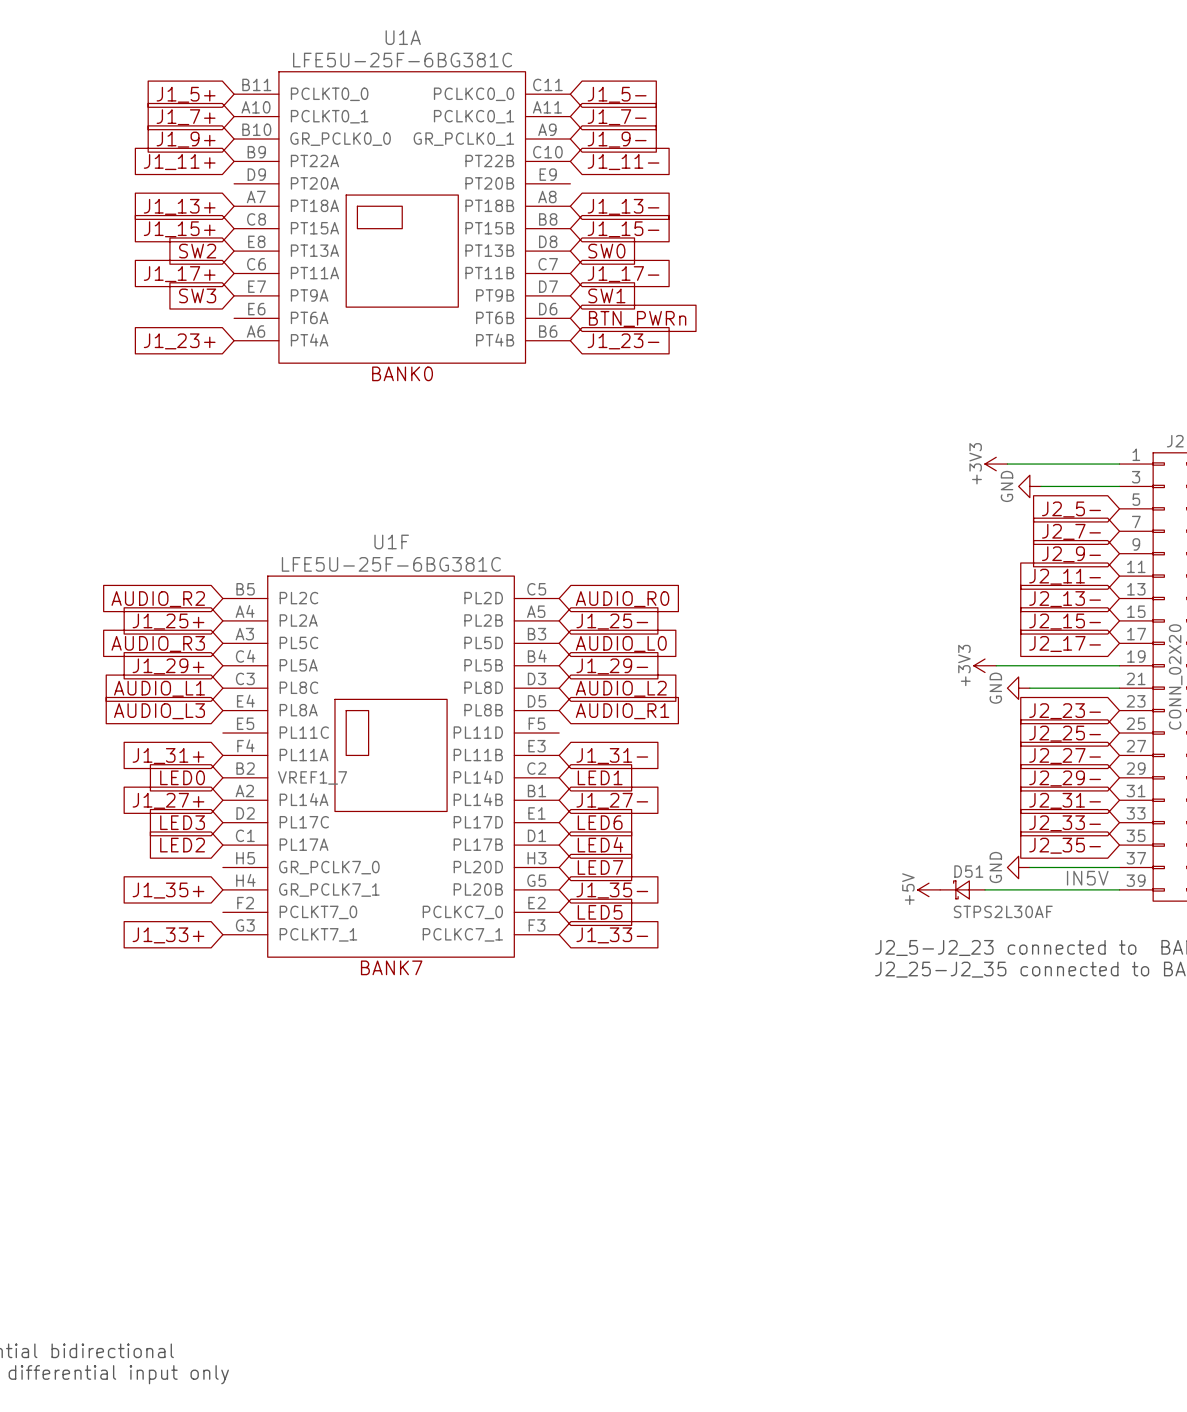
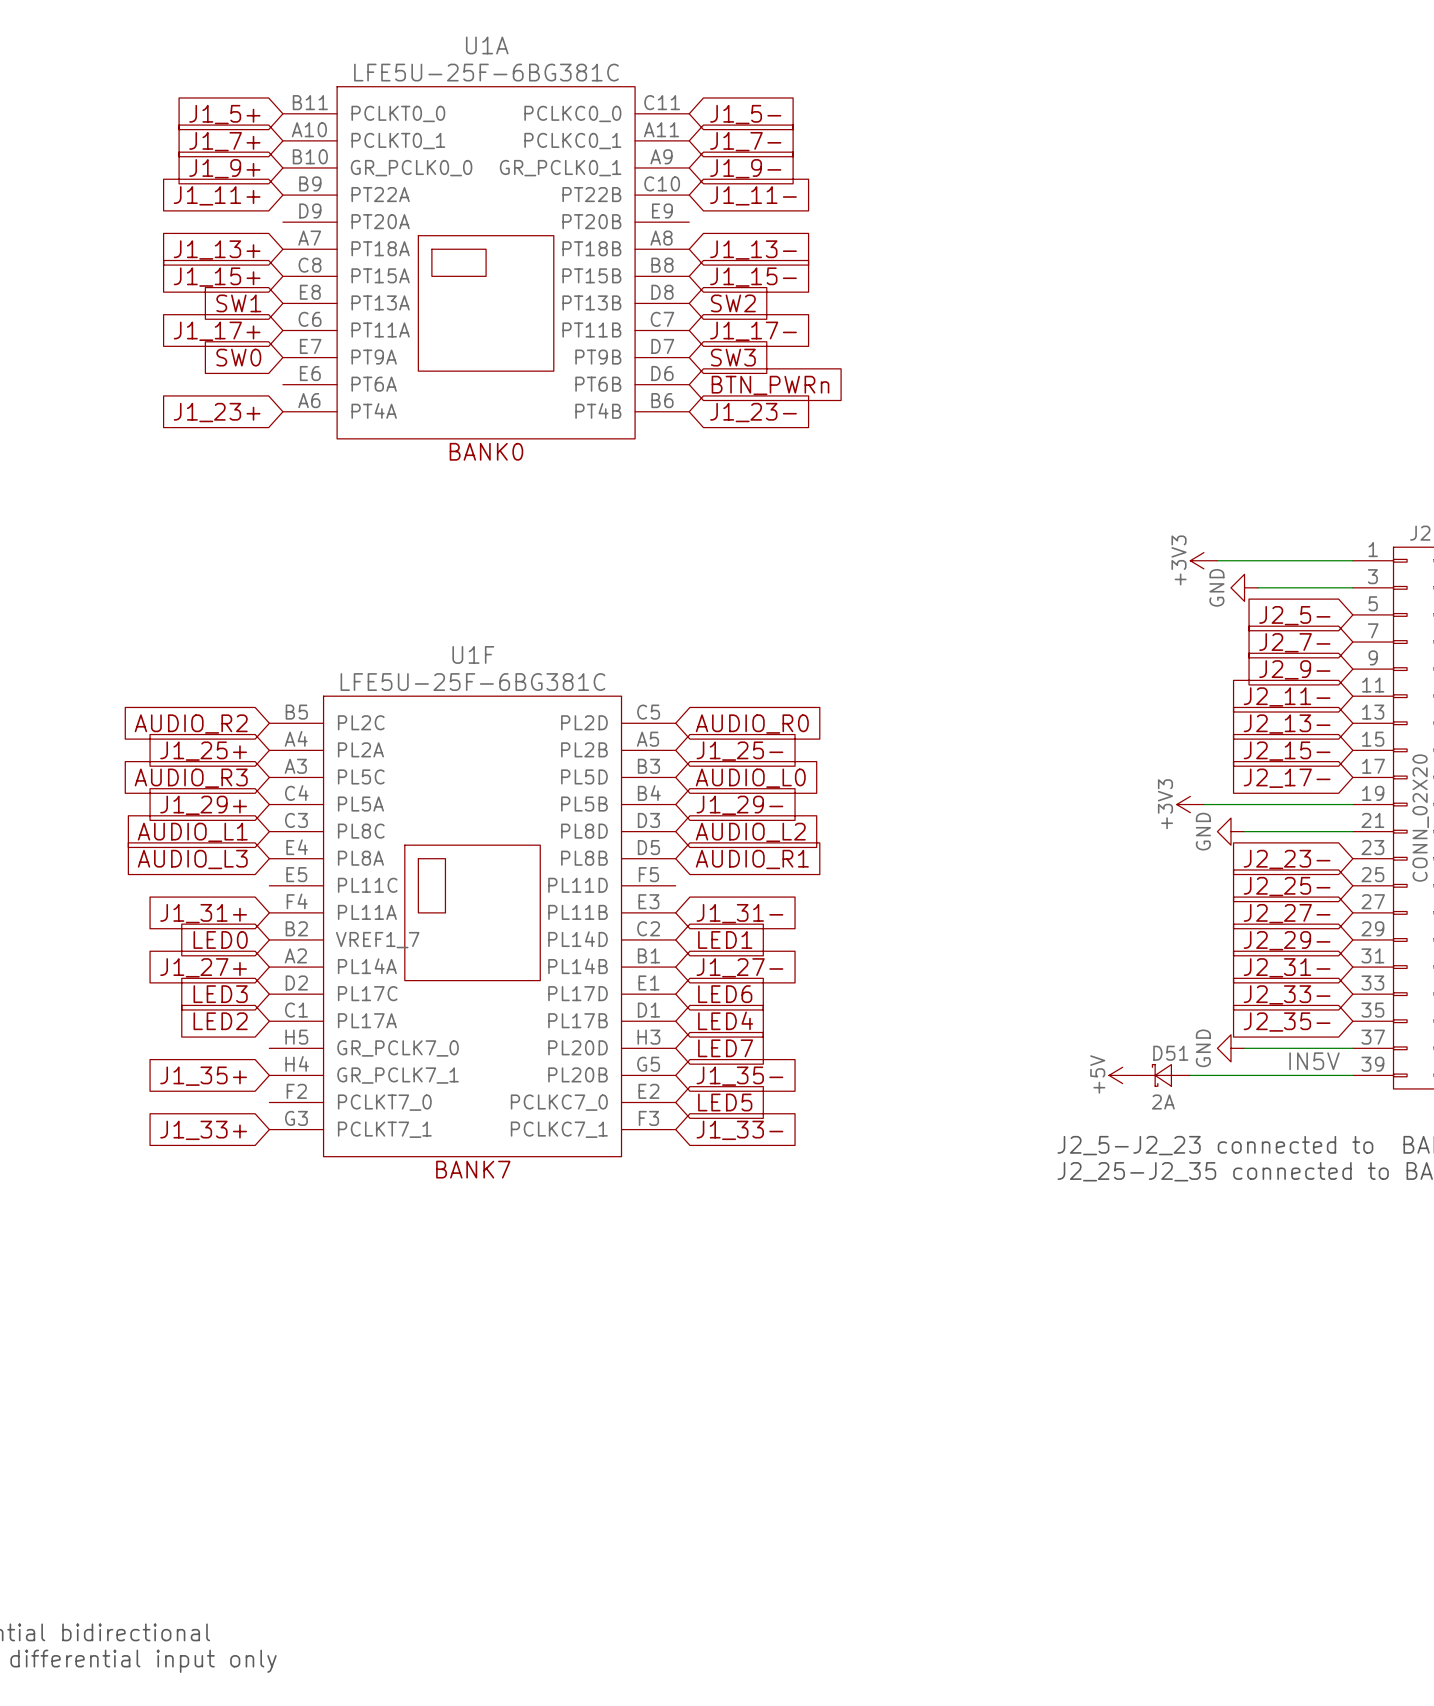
global label: SW2 (197, 251) -> SW1 (238, 303)
global label: SW0 (606, 251) -> SW2 (733, 303)
global label: SW3 (197, 295) -> SW0 (238, 357)
global label: SW1 (606, 295) -> SW3 (733, 357)
D51 value: STPS2L30AF (1003, 911) -> 2A (1163, 1101)

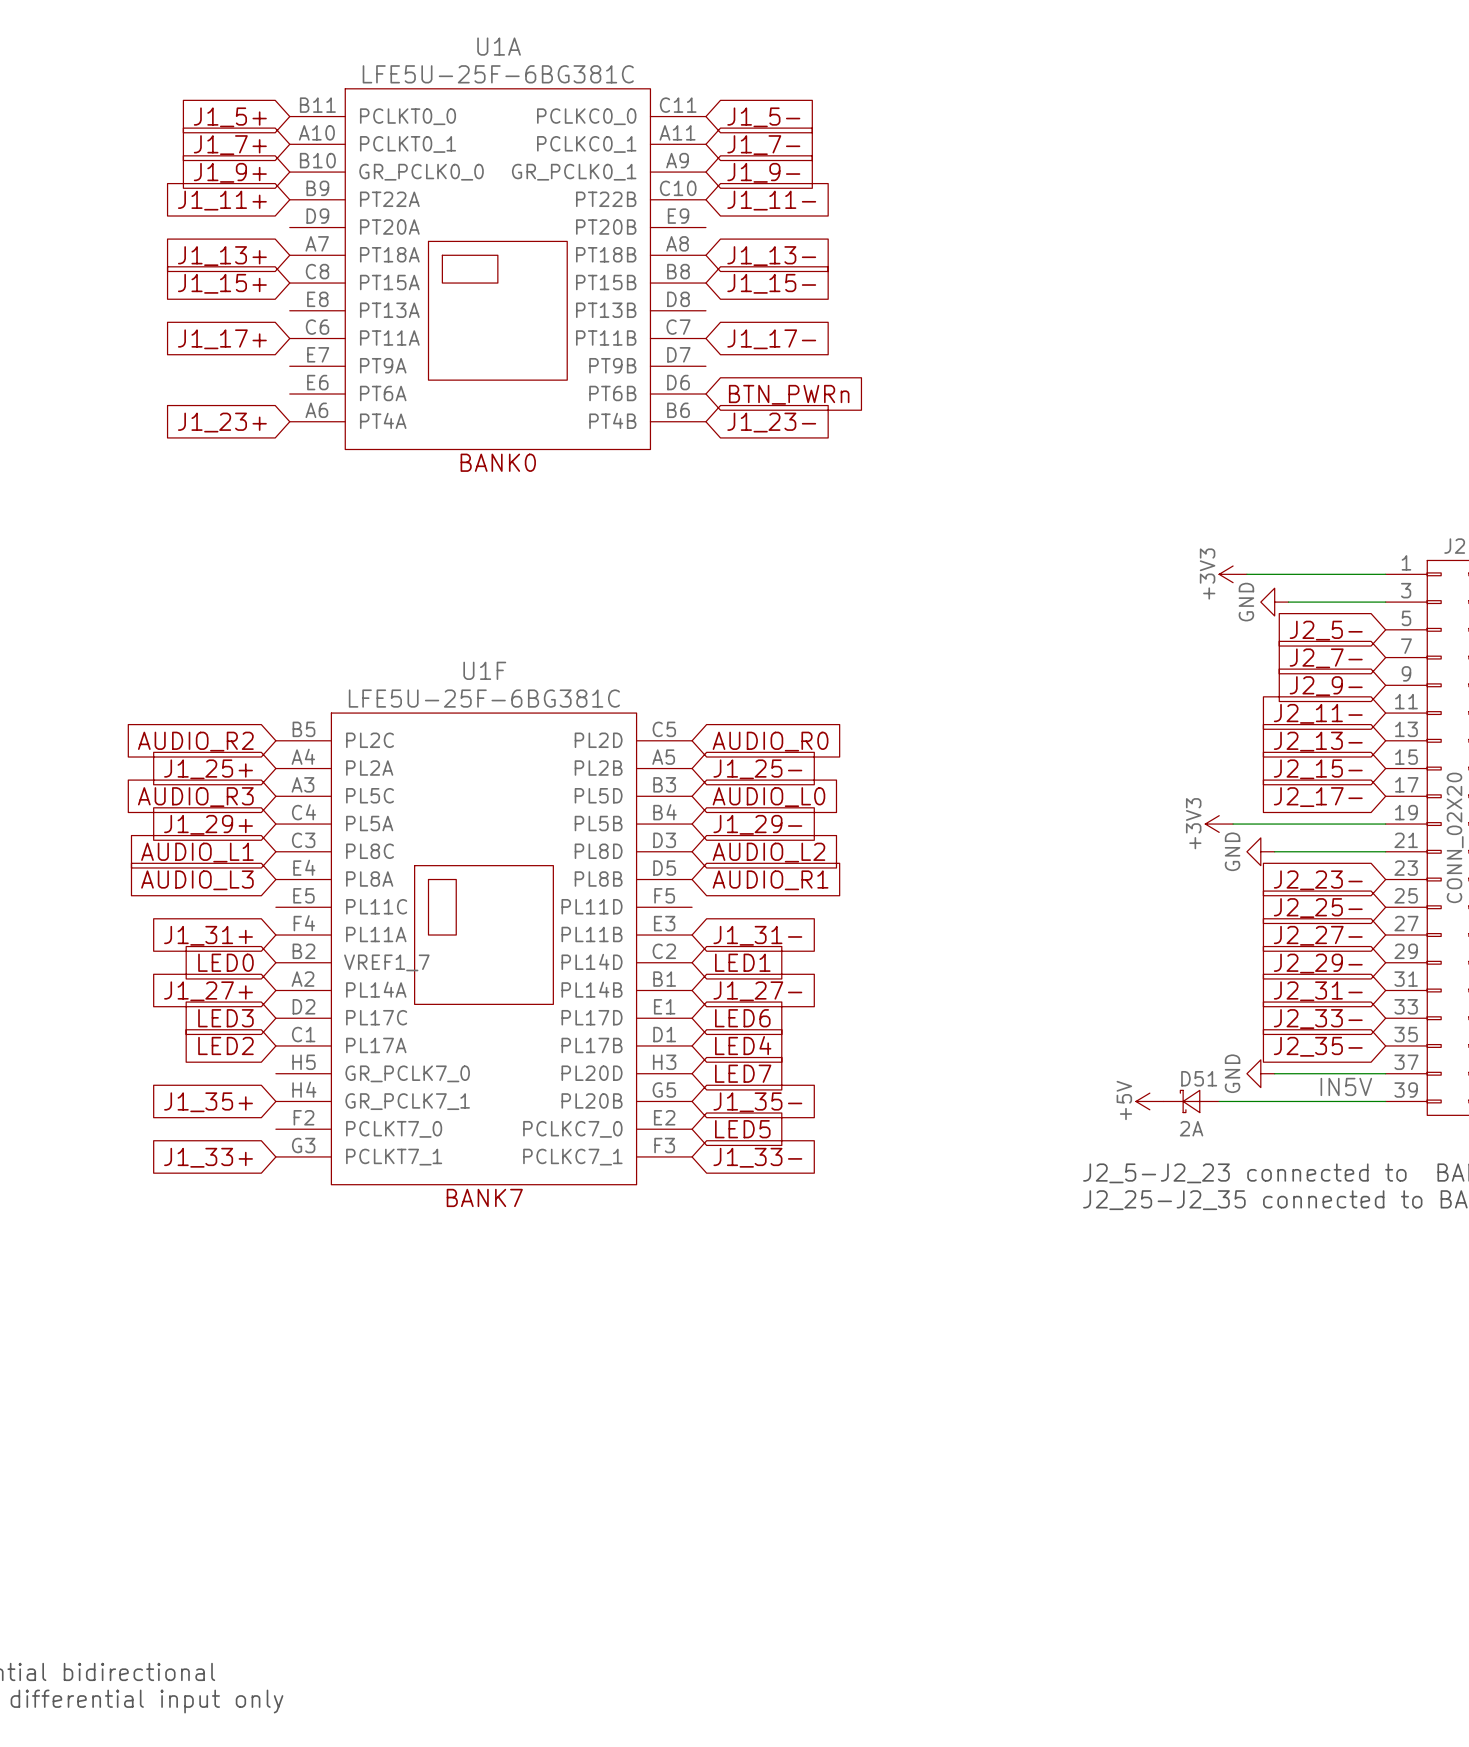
global label: SW1 (238, 303) -> none
global label: SW2 (733, 303) -> none
global label: SW0 (238, 357) -> none
global label: SW3 (733, 357) -> none

